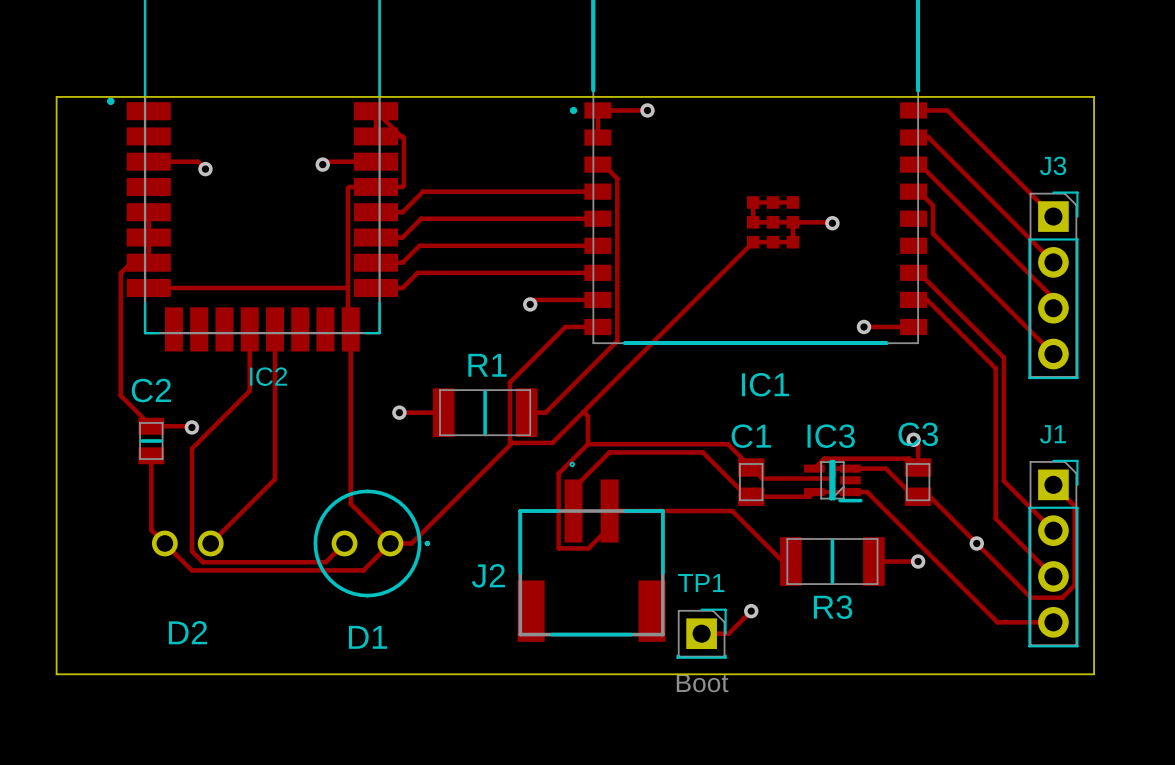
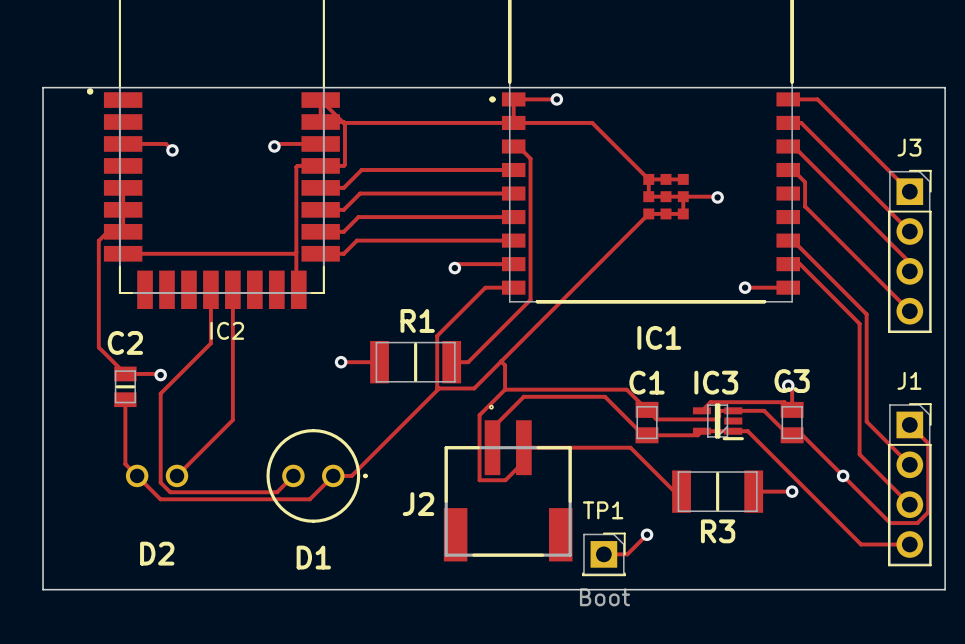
track: none -> (343, 122) (592, 122) (648, 179)
track: (350, 329) (350, 503) (390, 543) -> none

